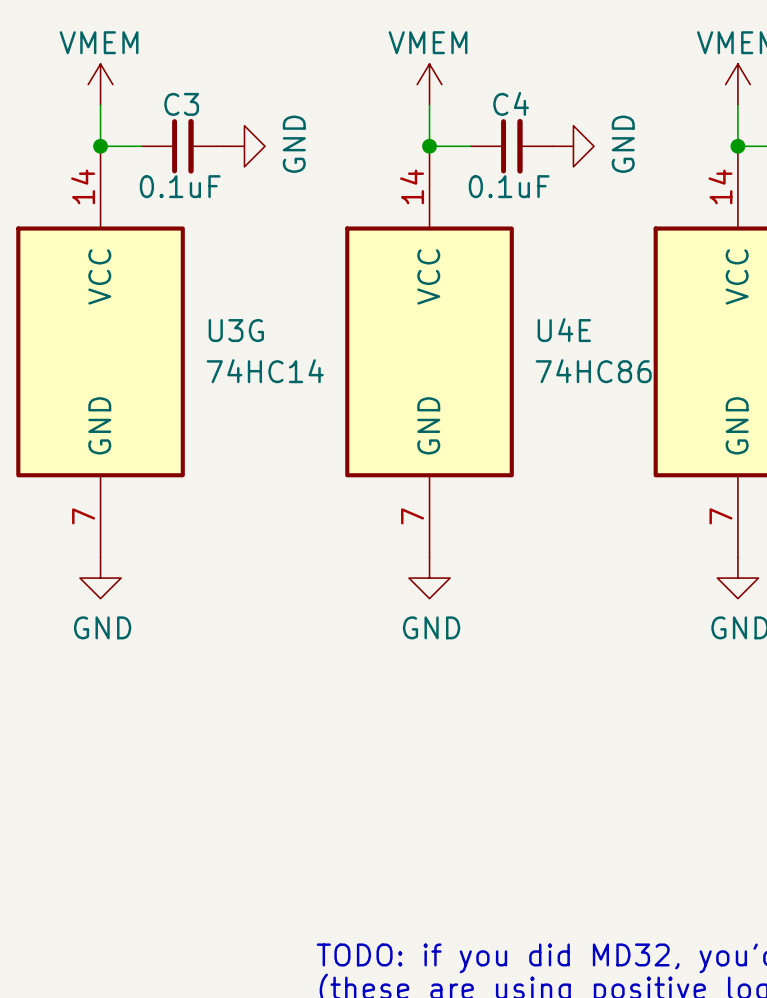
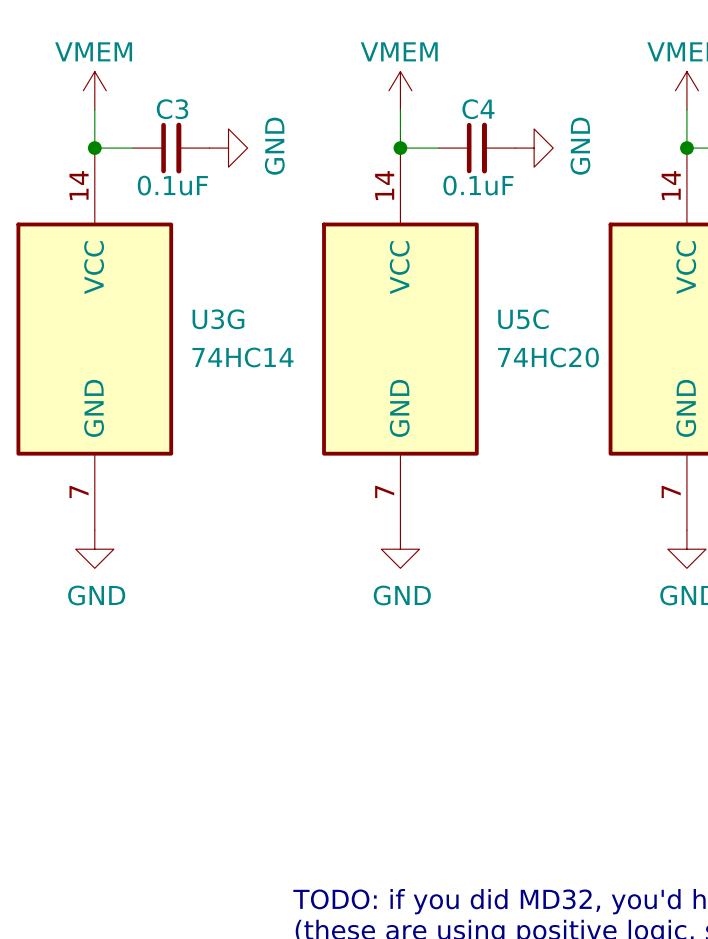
U4E name: U4E (564, 330) -> U5C (523, 319)
U4E value: 74HC86 (593, 371) -> 74HC20 (548, 357)

